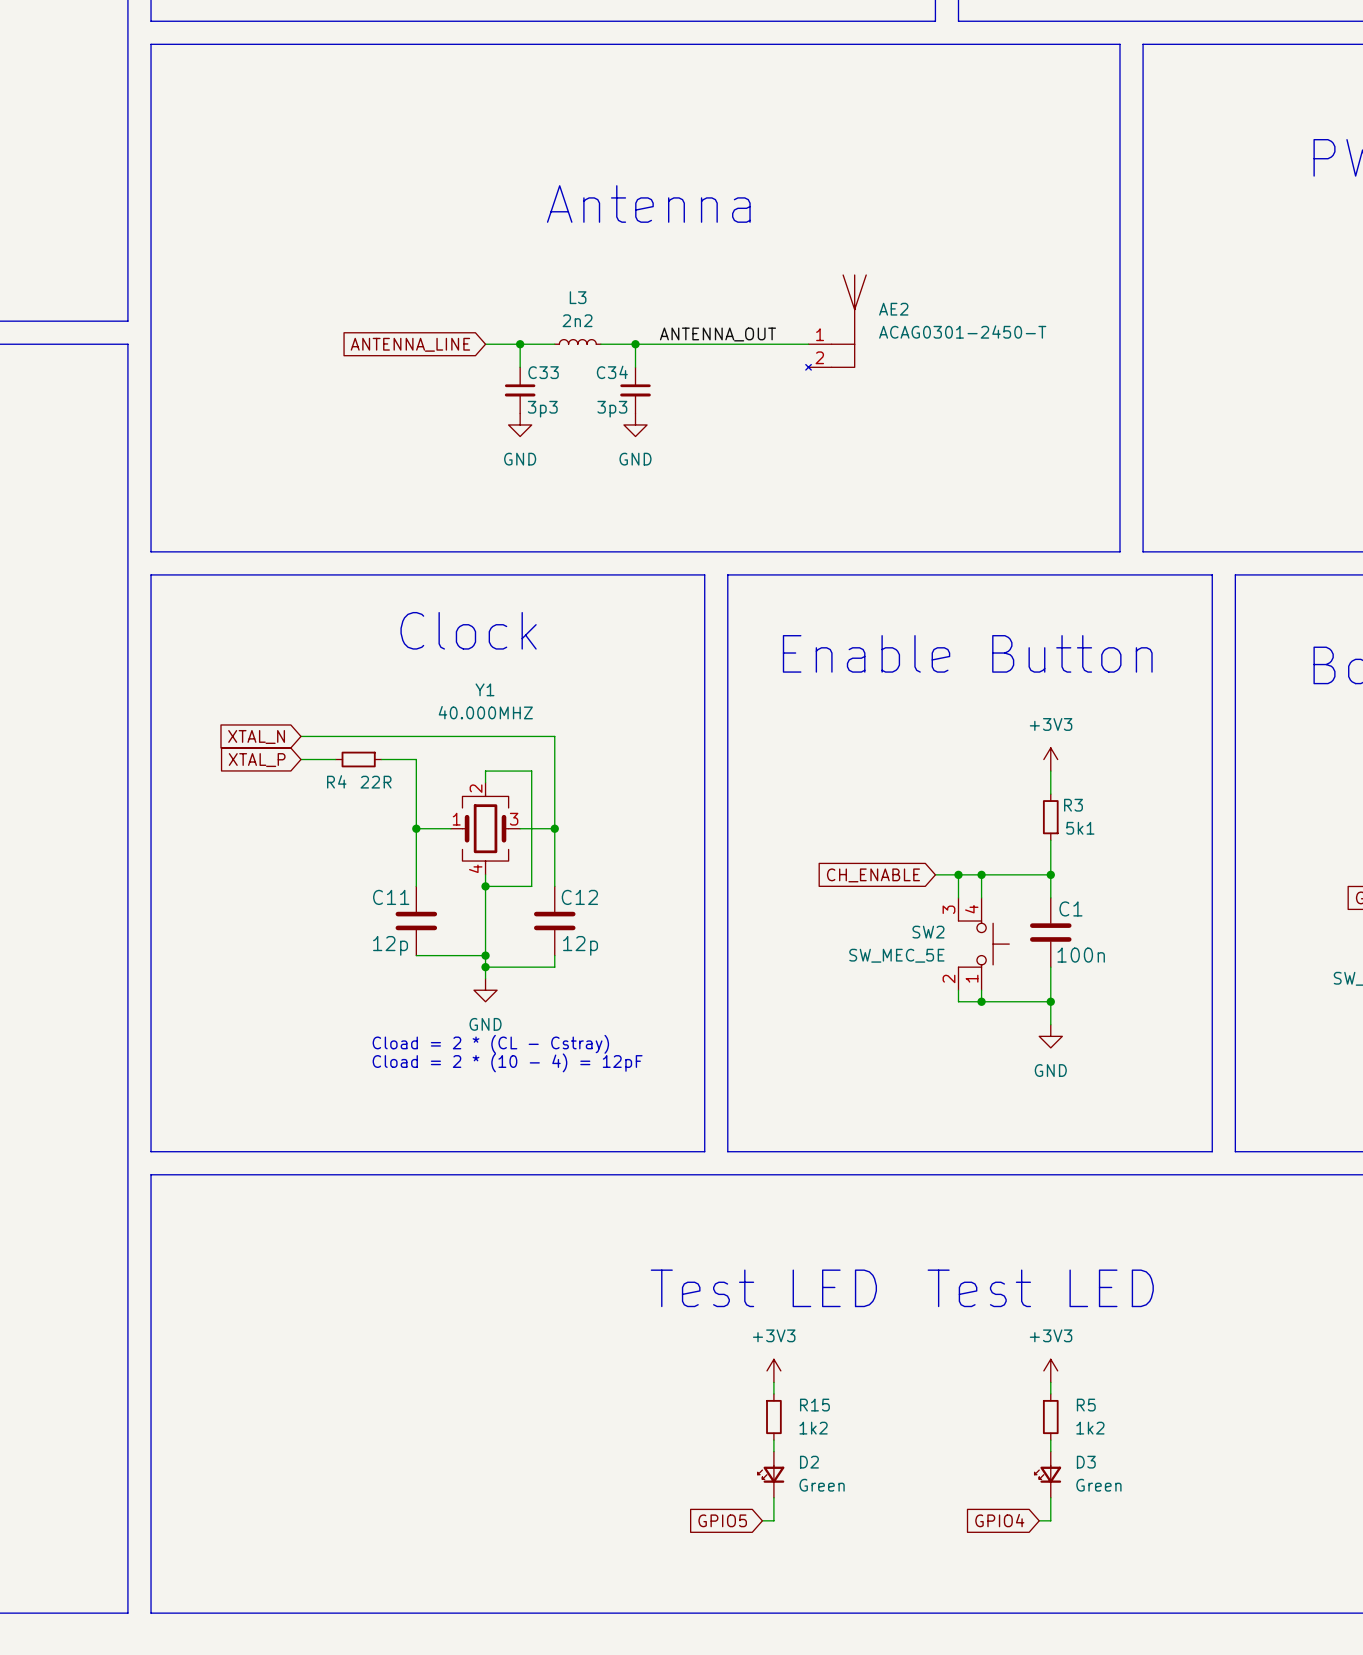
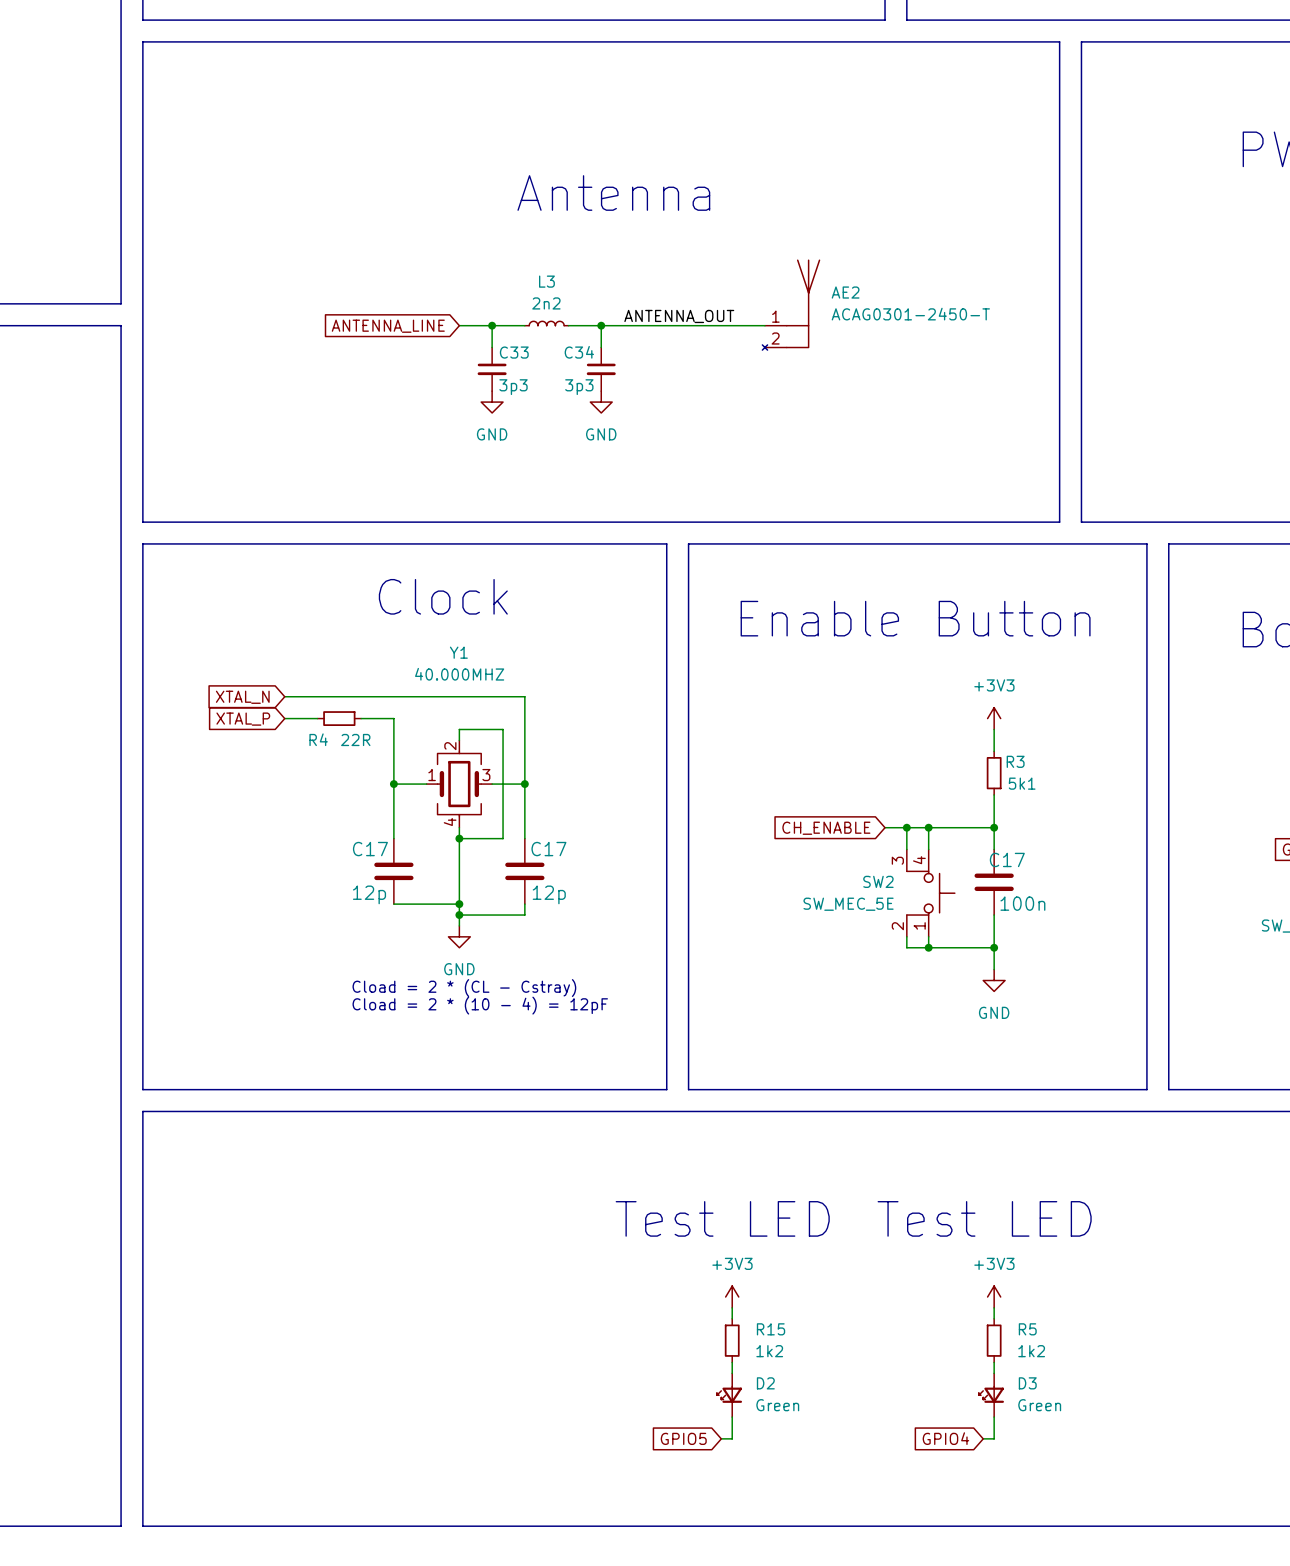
C11 name: C11 (391, 897) -> C17 (370, 849)
C12 name: C12 (579, 897) -> C17 (548, 849)
C1 name: C1 (1070, 908) -> C17 (1007, 859)

